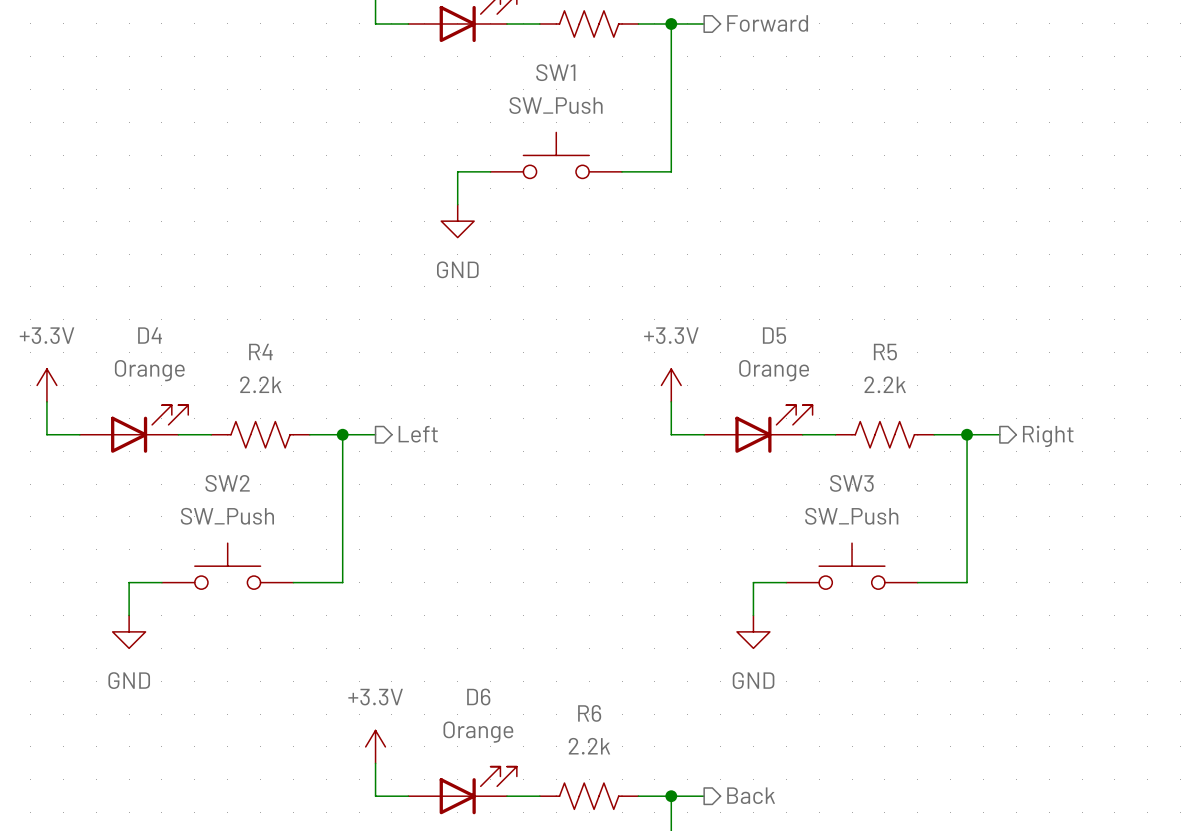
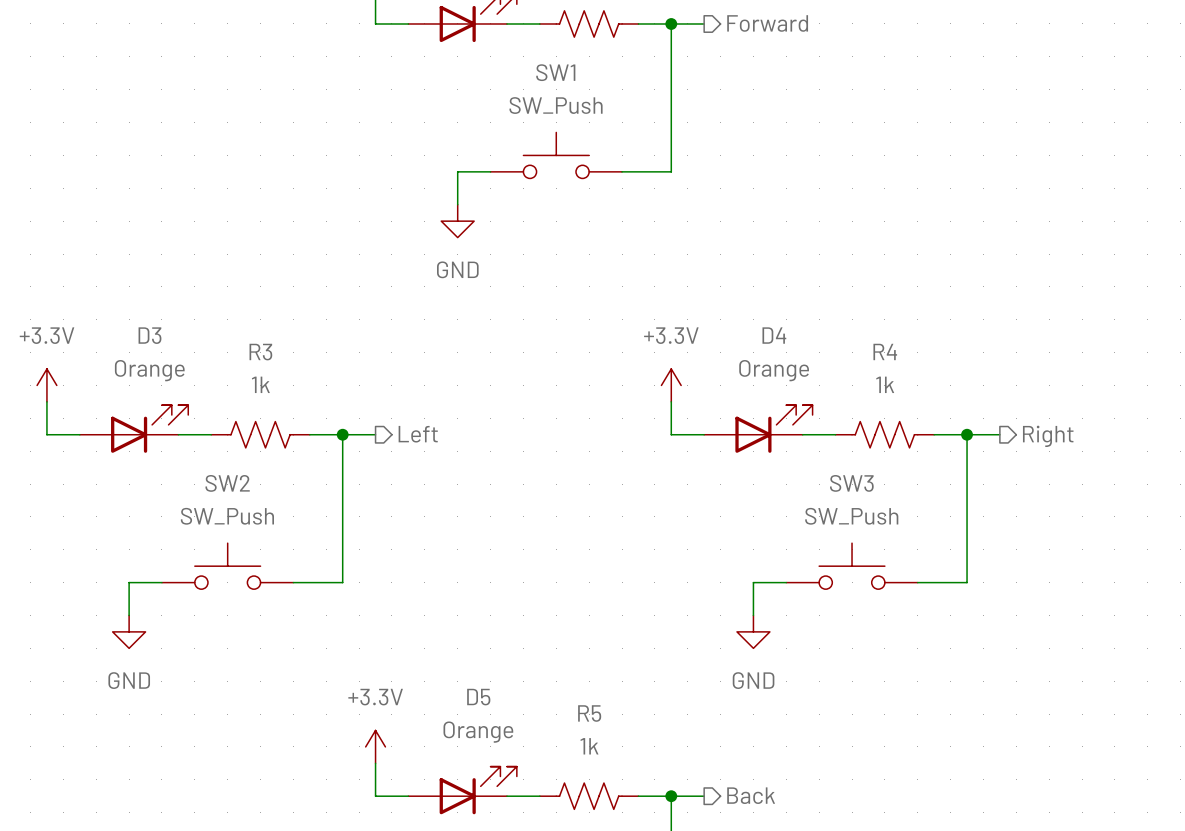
D4 name: D4 (150, 335) -> D3 (149, 335)
D5 name: D5 (774, 335) -> D4 (774, 335)
R4 name: R4 (260, 351) -> R3 (260, 352)
R5 name: R5 (885, 352) -> R4 (885, 351)
R4 value: 2.2k (260, 384) -> 1k (260, 384)
R5 value: 2.2k (885, 384) -> 1k (885, 384)
D6 name: D6 (478, 696) -> D5 (478, 697)
R6 name: R6 (589, 713) -> R5 (589, 713)
R6 value: 2.2k (589, 746) -> 1k (589, 746)

